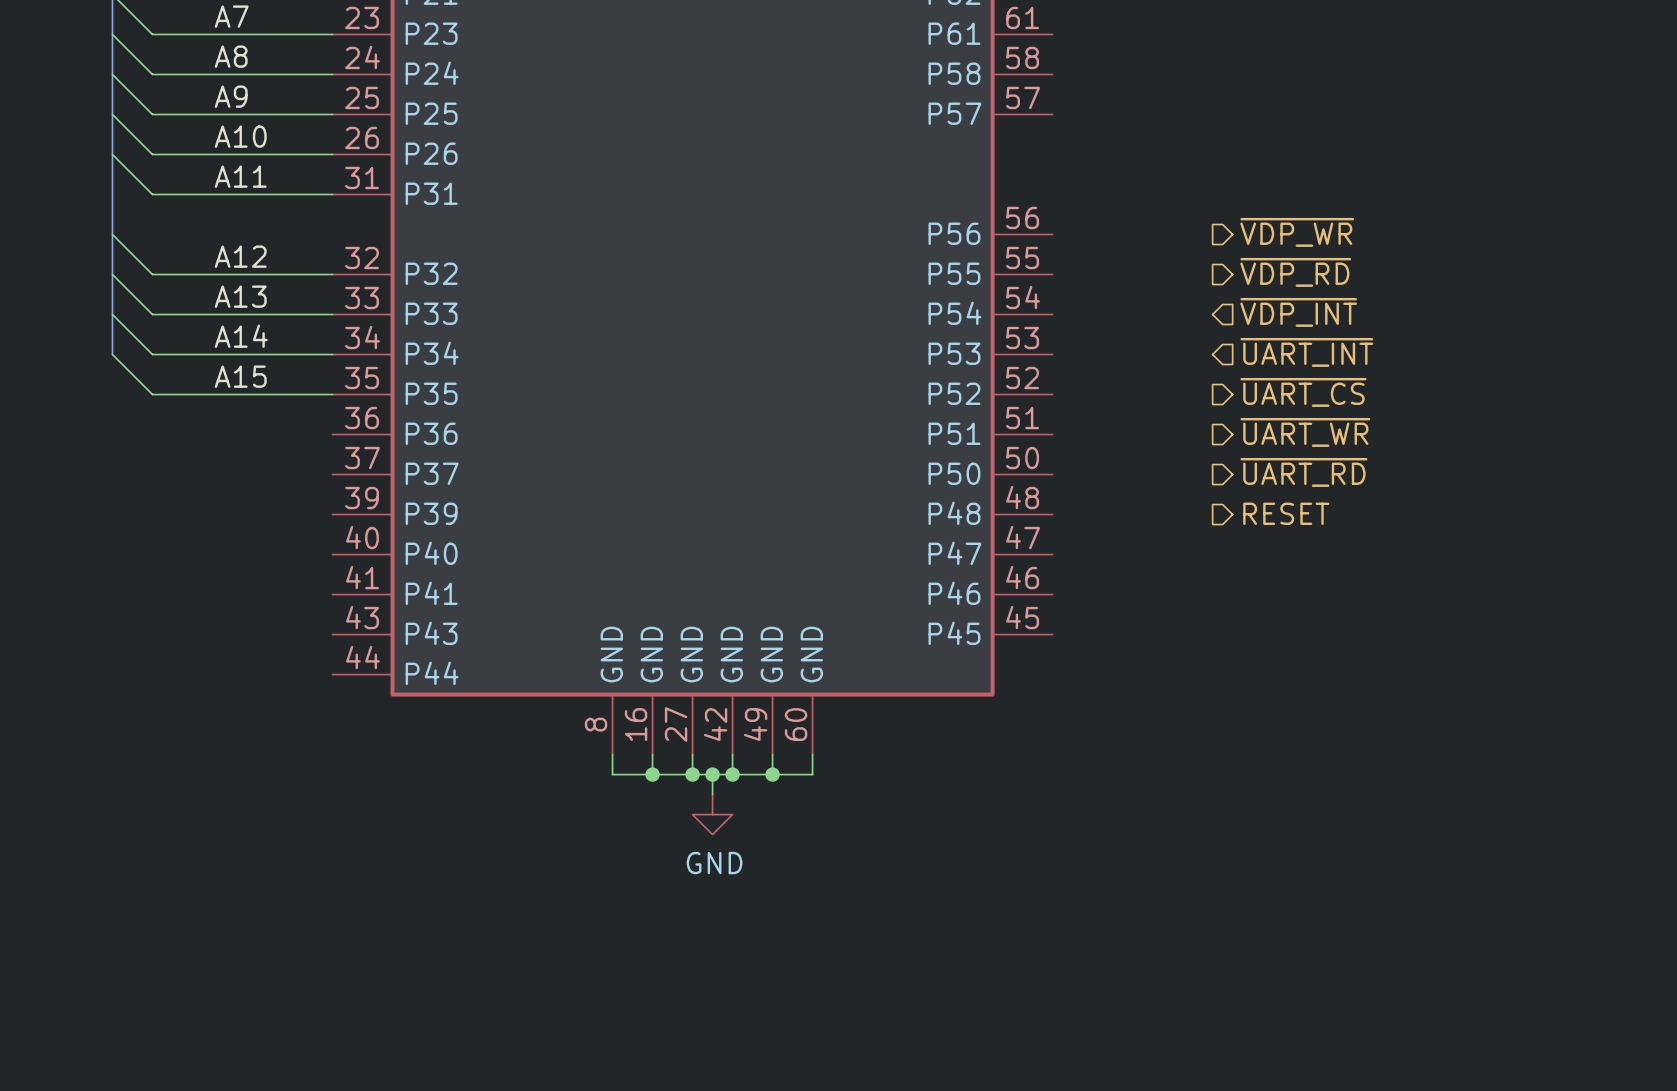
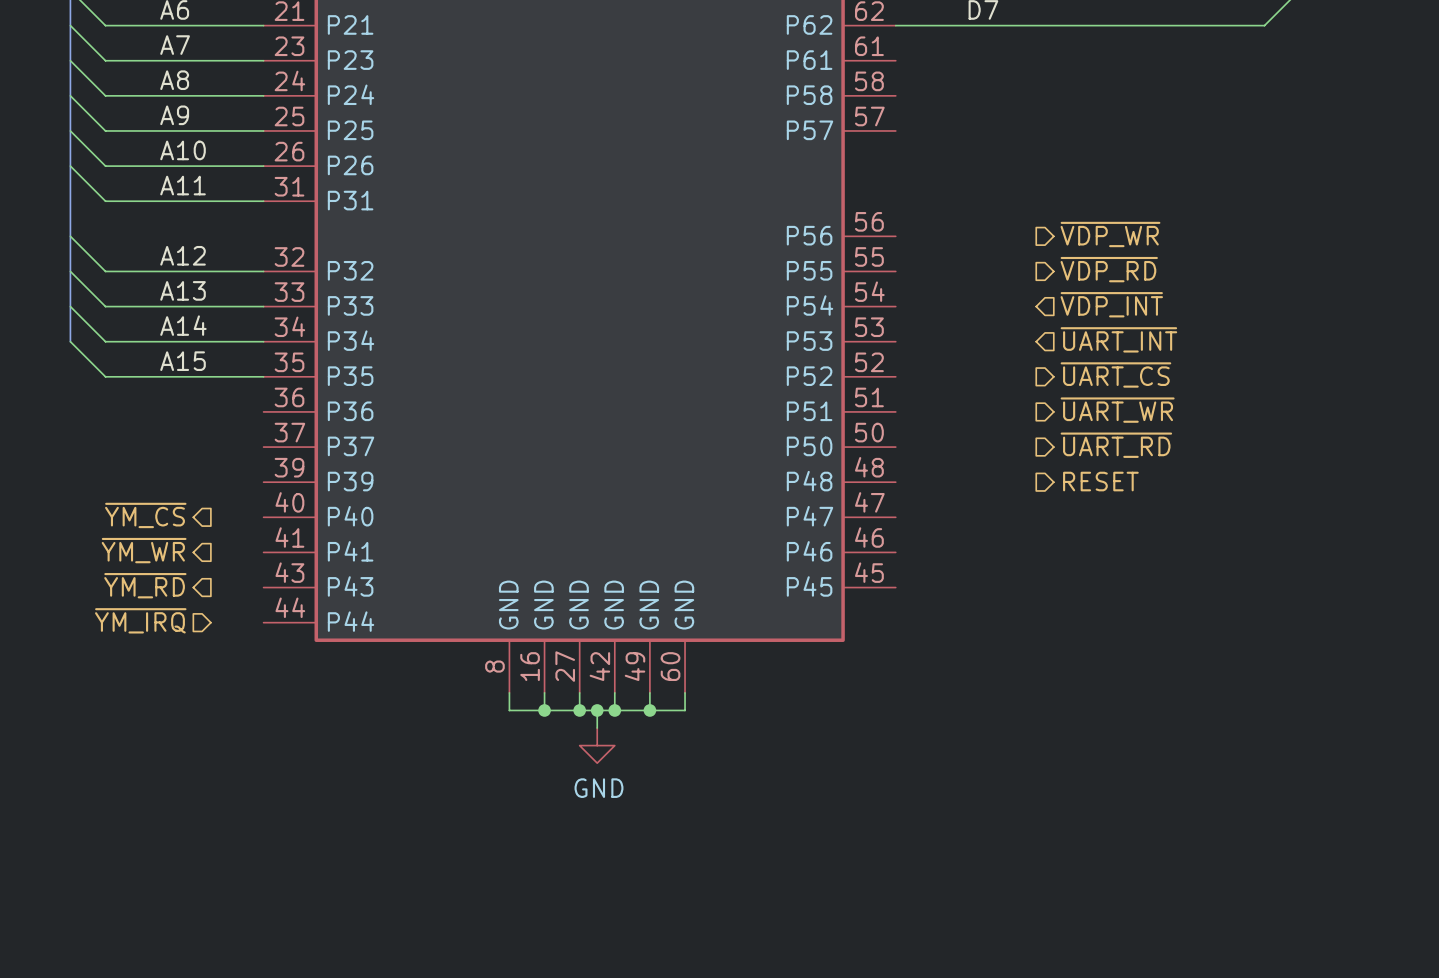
hierarchical label: none -> ~{YM_CS} (145, 515)
hierarchical label: none -> ~{YM_WR} (144, 550)
hierarchical label: none -> ~{YM_RD} (145, 585)
hierarchical label: none -> ~{YM_IRQ} (140, 620)

